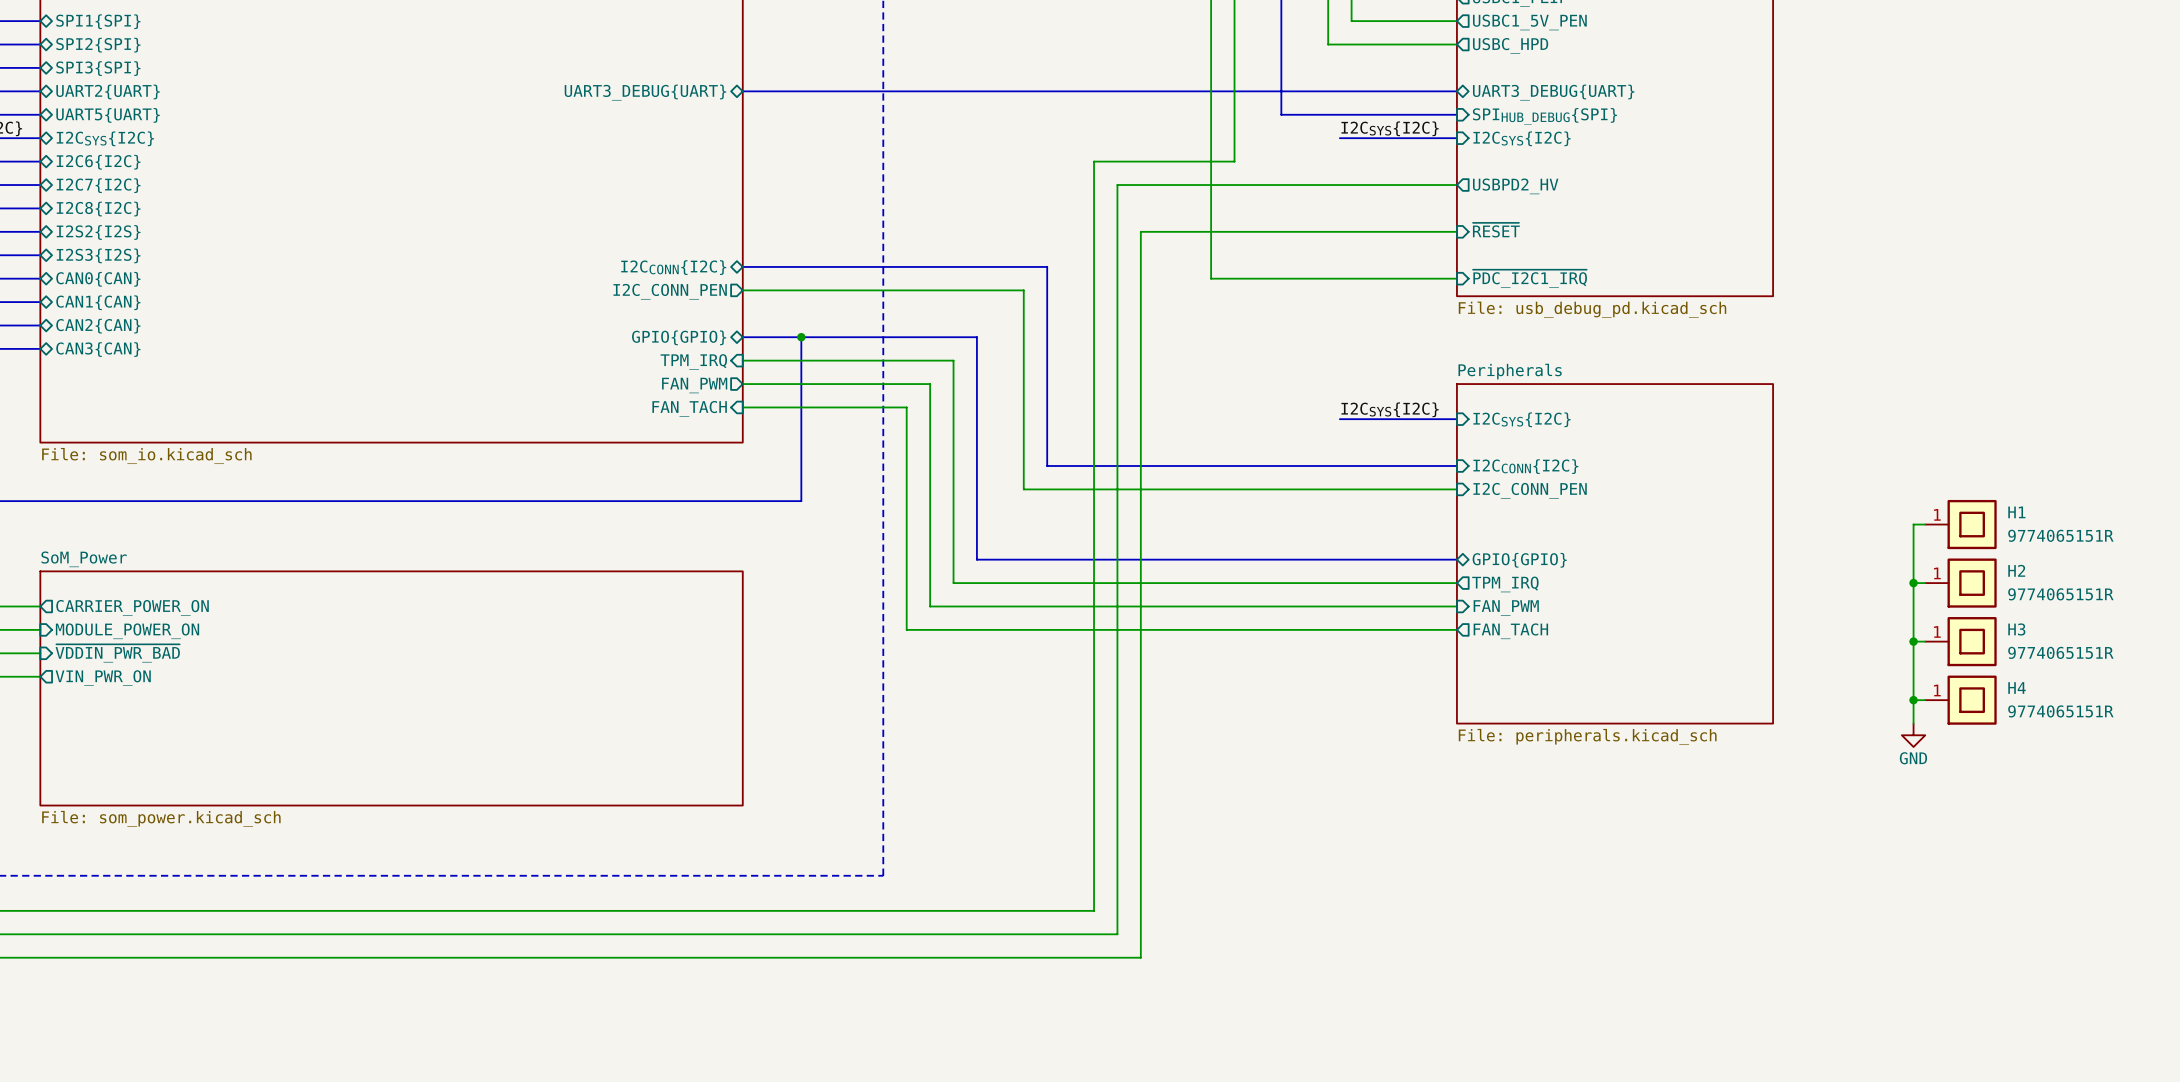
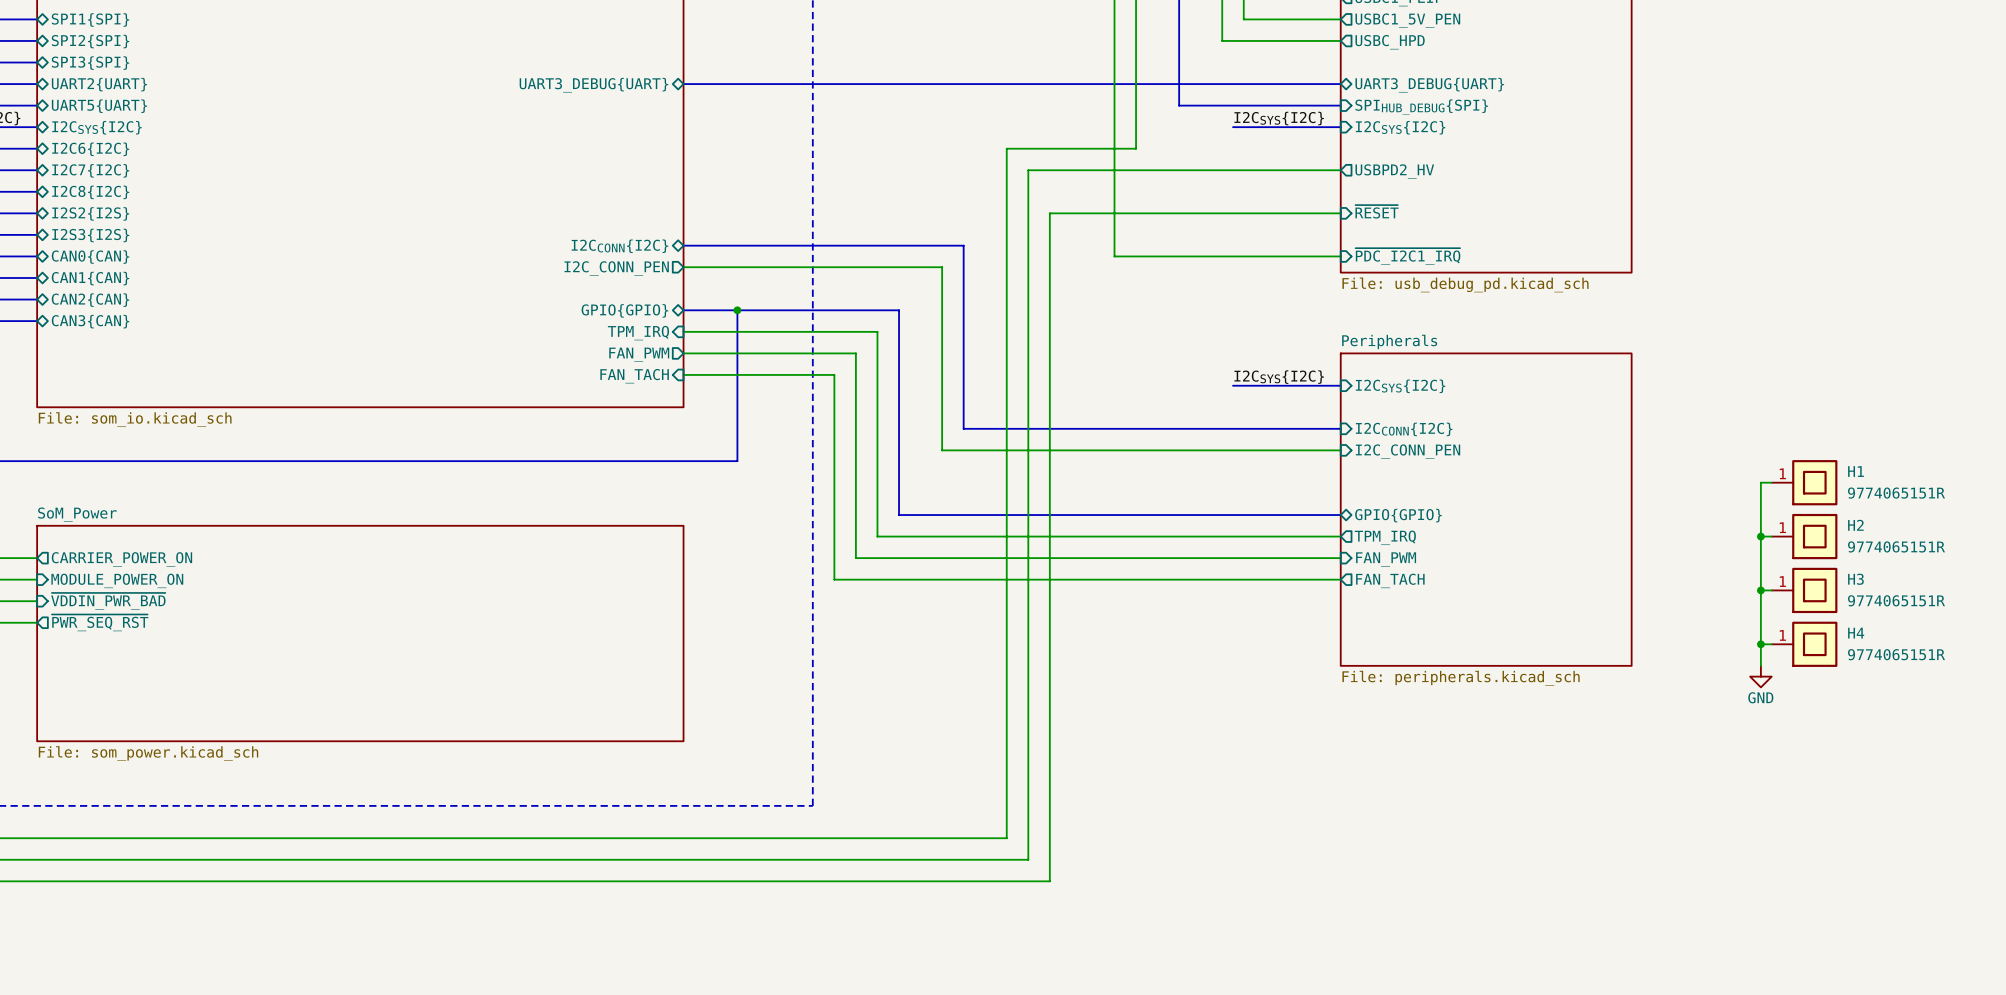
sheet pin: VIN_PWR_ON (103, 678) -> ~{PWR_SEQ_RST} (100, 622)

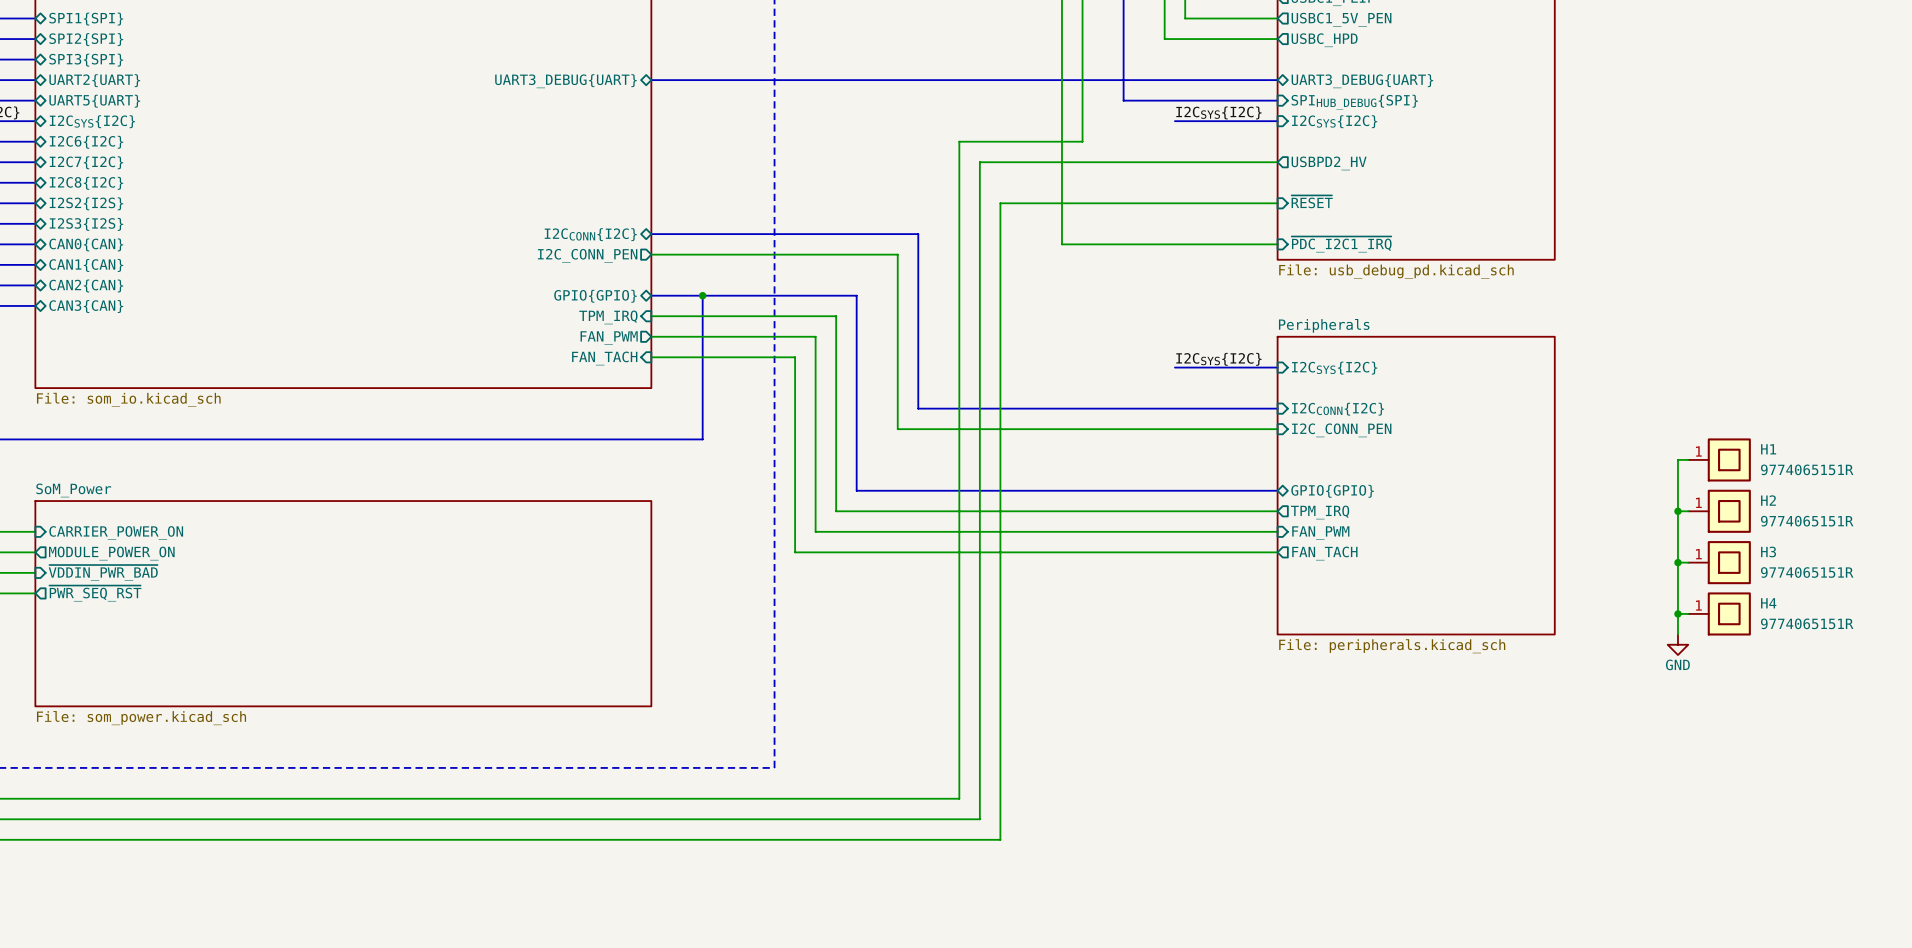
sheet pin shape: output (121, 559) -> input (116, 533)
sheet pin shape: input (117, 580) -> output (111, 553)

